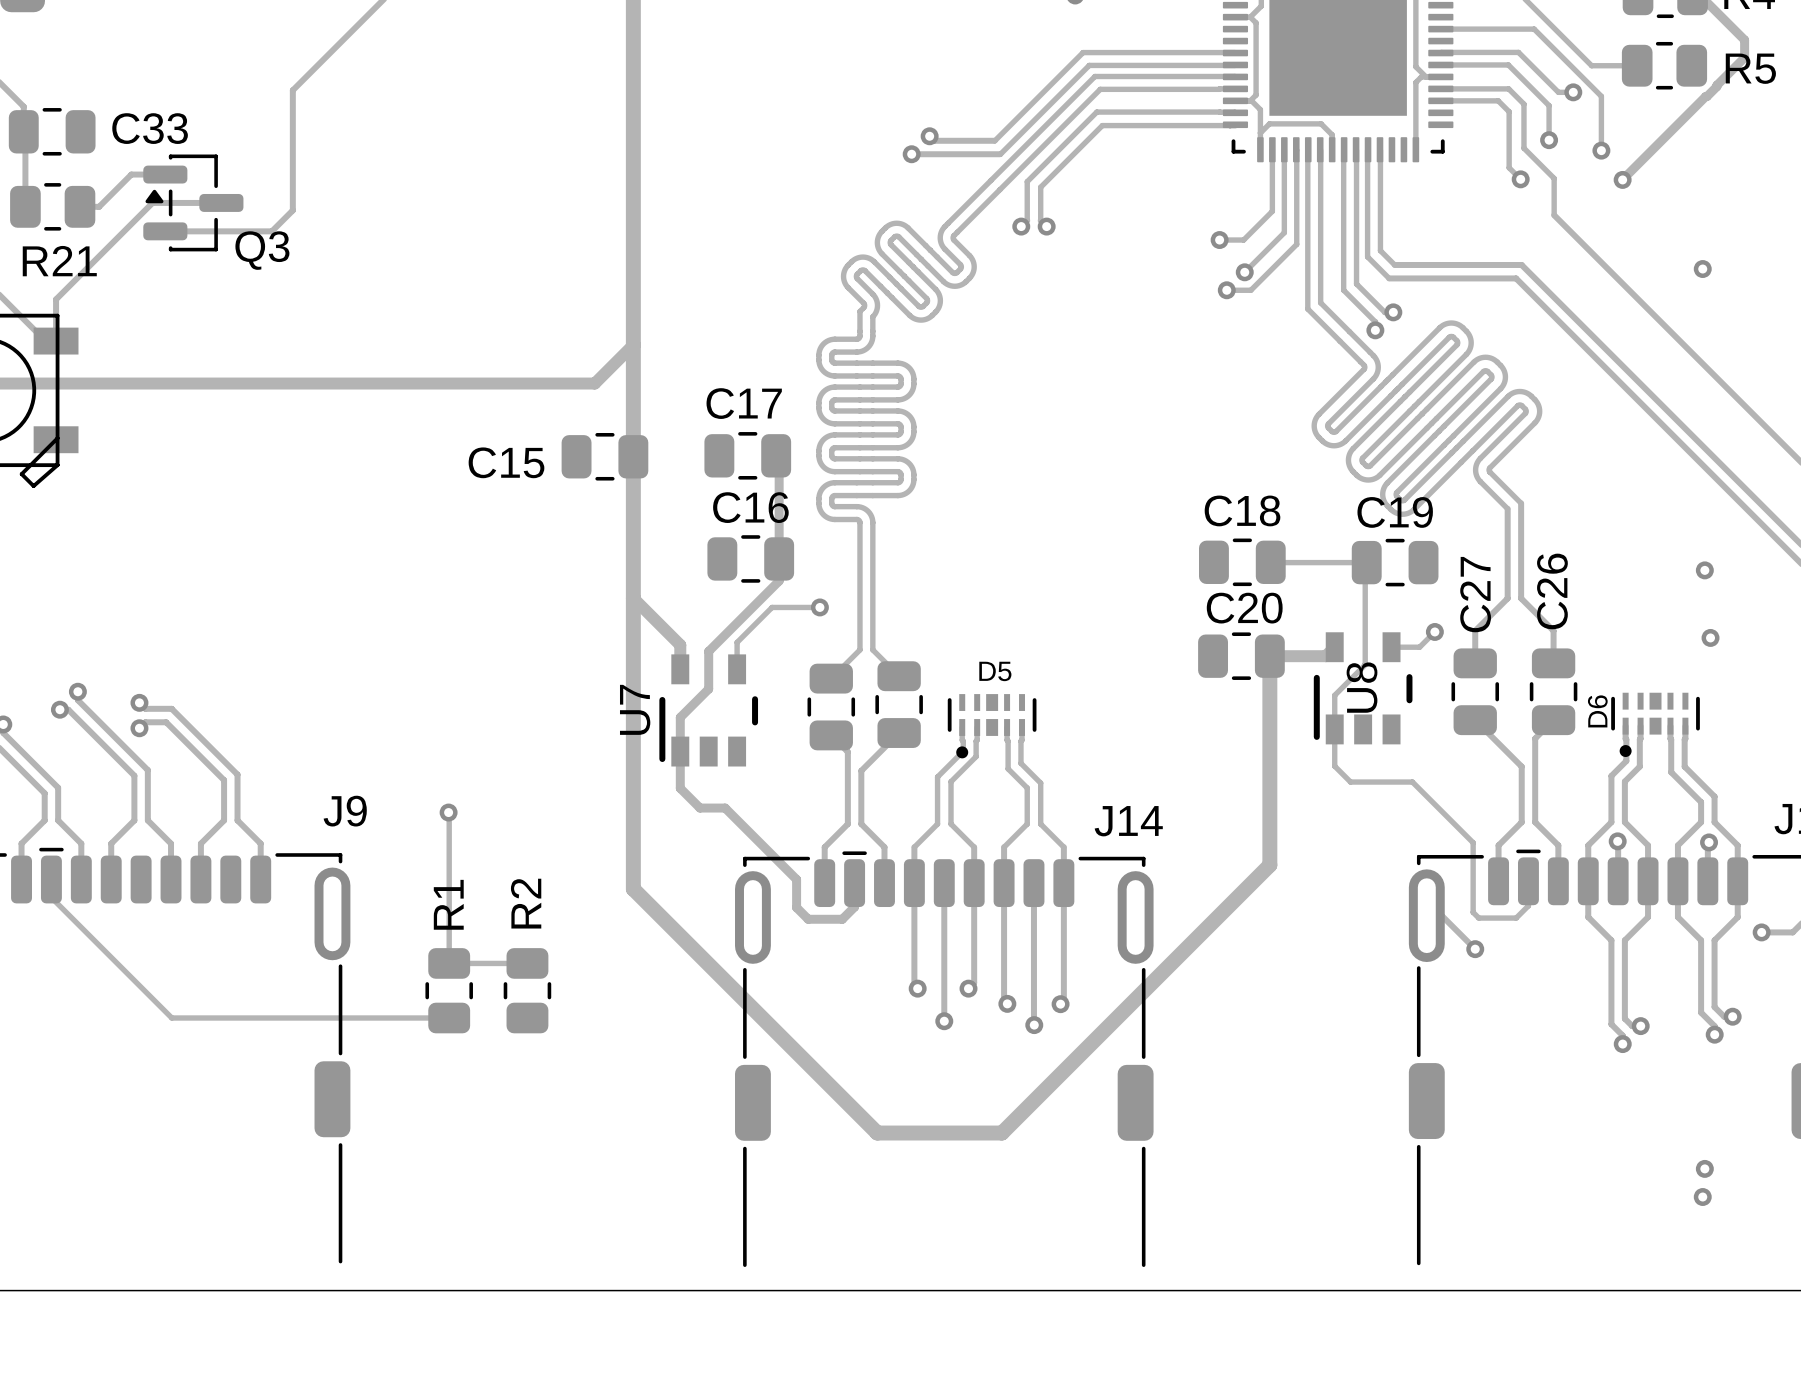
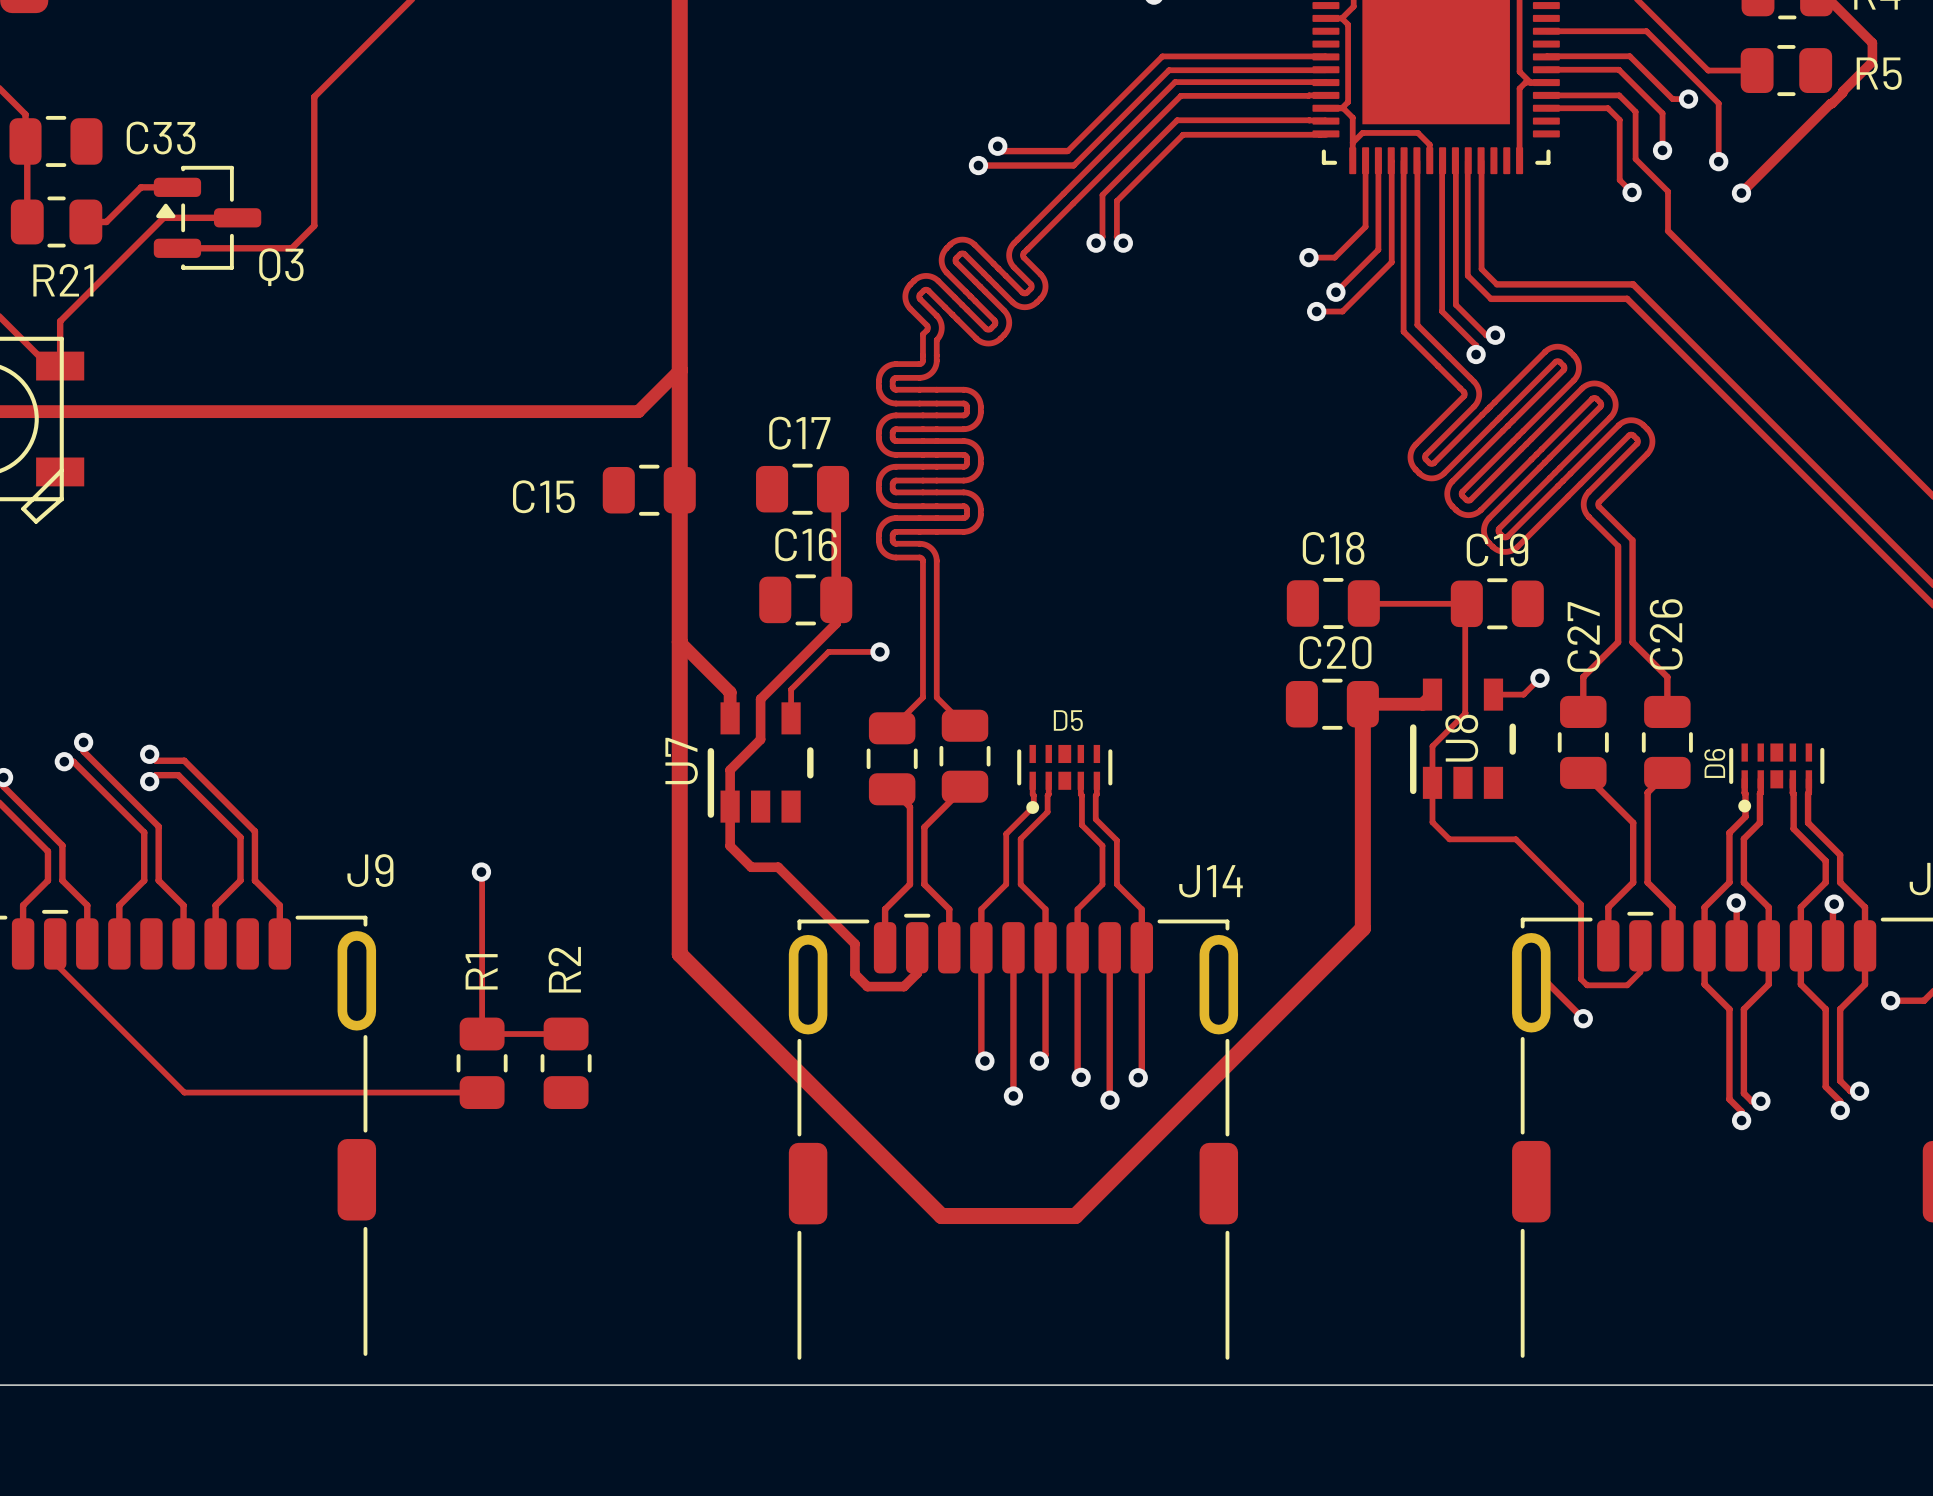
via: (1702, 269) -> none
via: (1704, 570) -> none
via: (1710, 637) -> none
via: (1704, 1168) -> none
via: (1702, 1197) -> none

